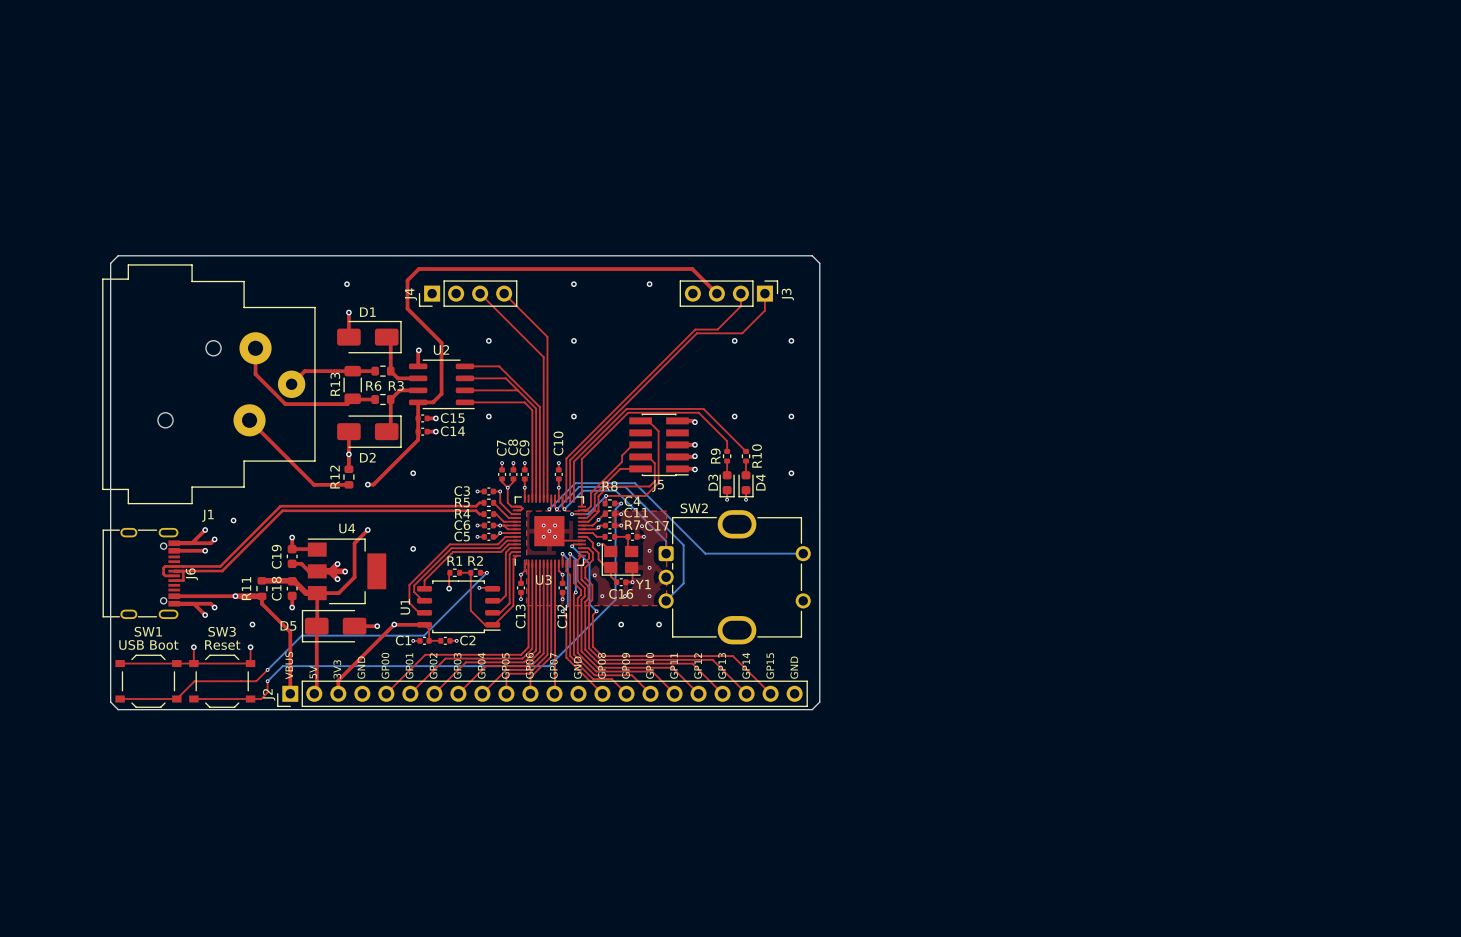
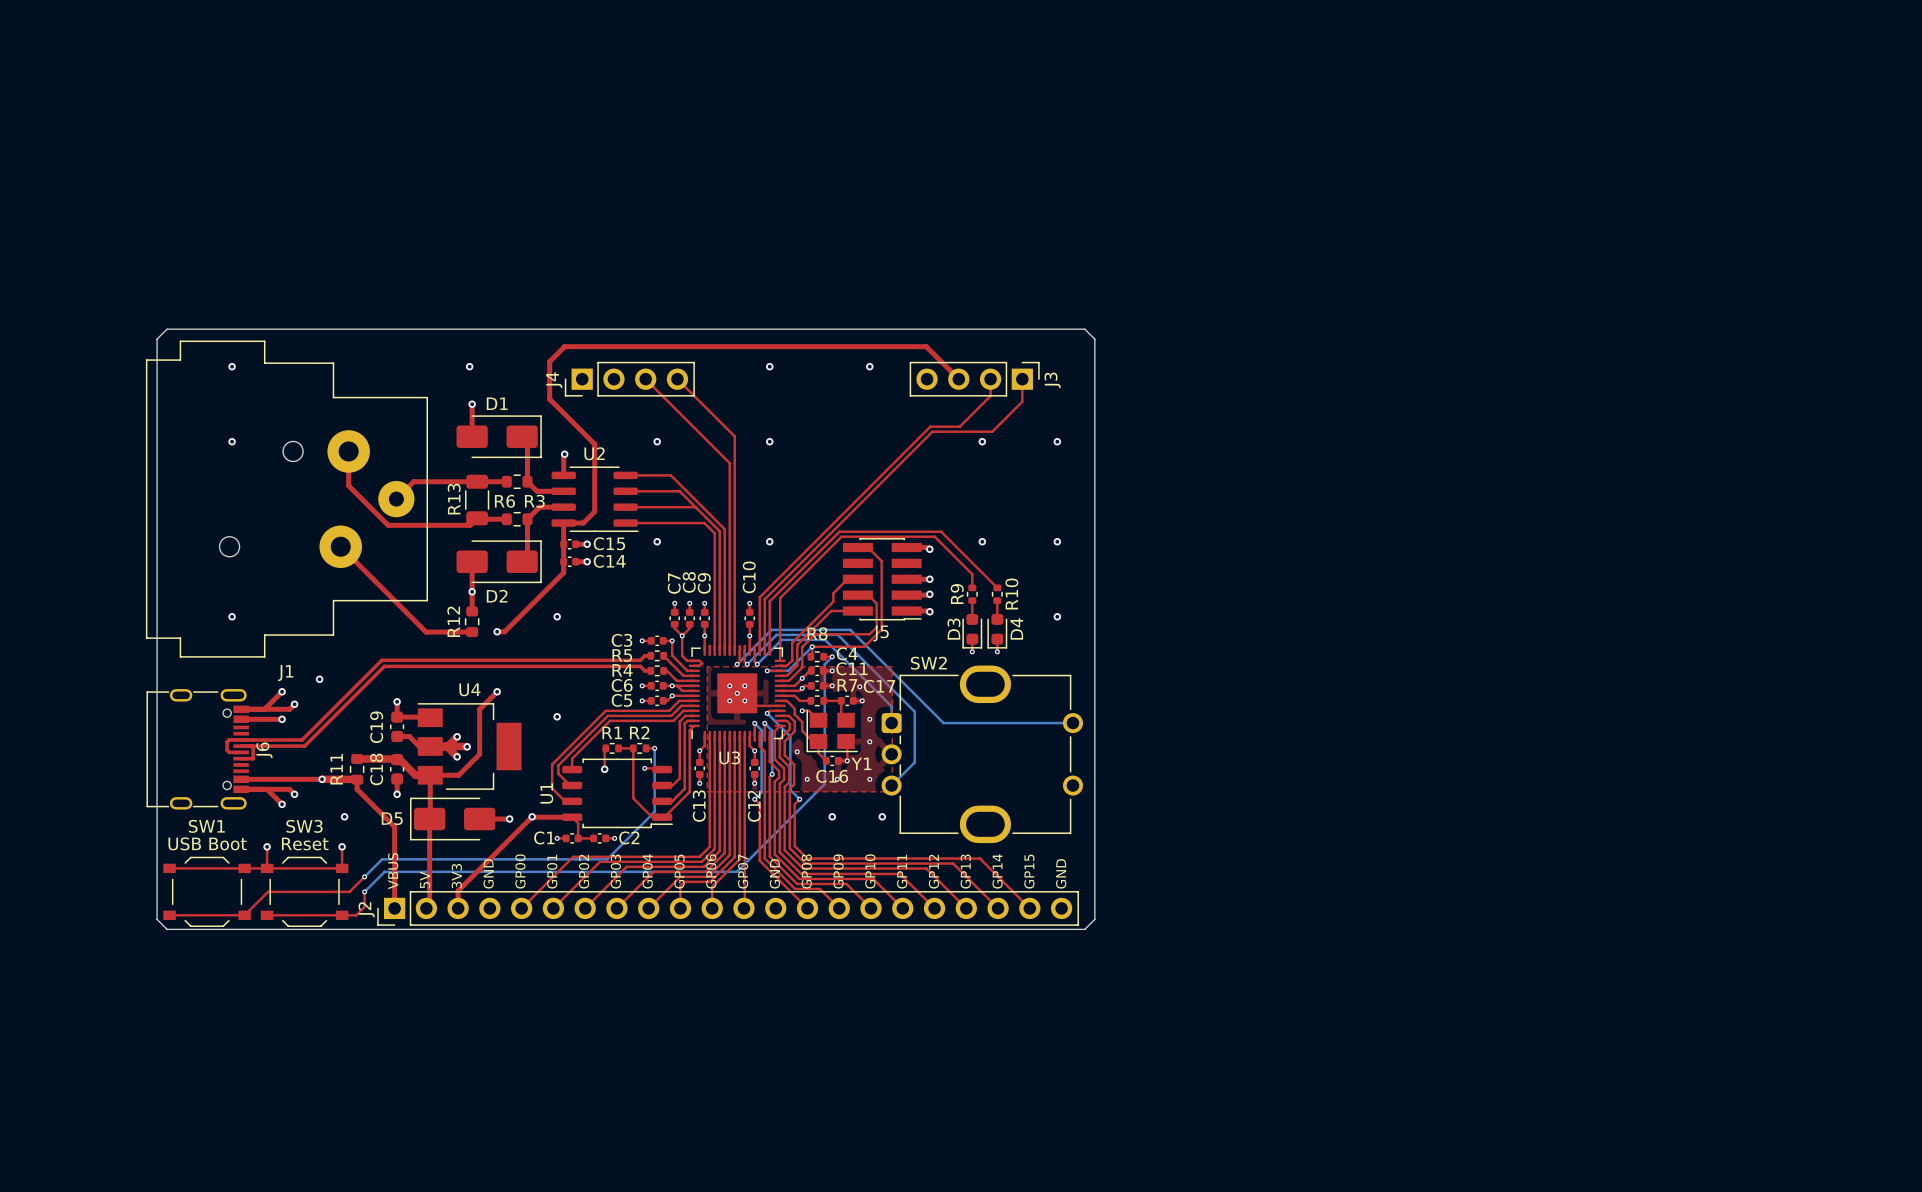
via: none -> (232, 366)
via: none -> (232, 441)
via: none -> (232, 616)
bottom track: (486, 572) (424, 635) (301, 635) (280, 656) -> (654, 748) (654, 811) (607, 859) (382, 859)

